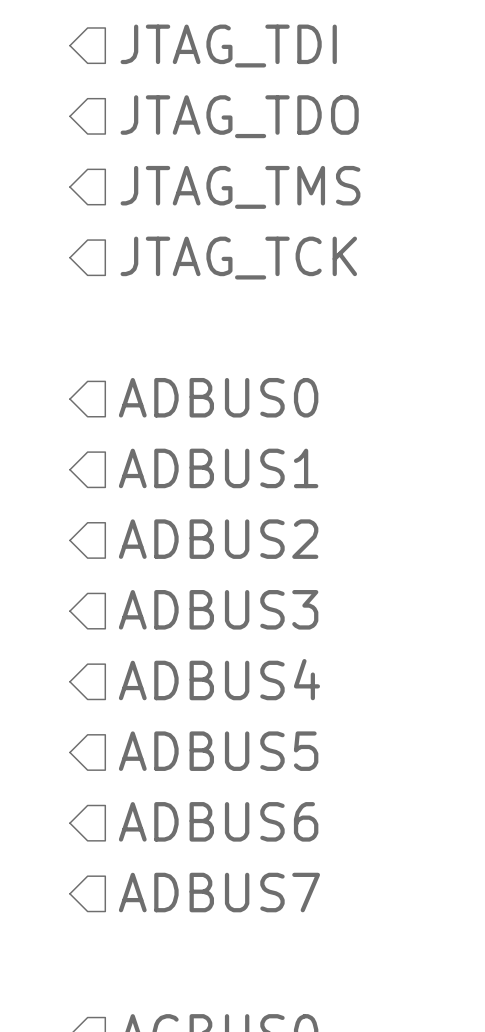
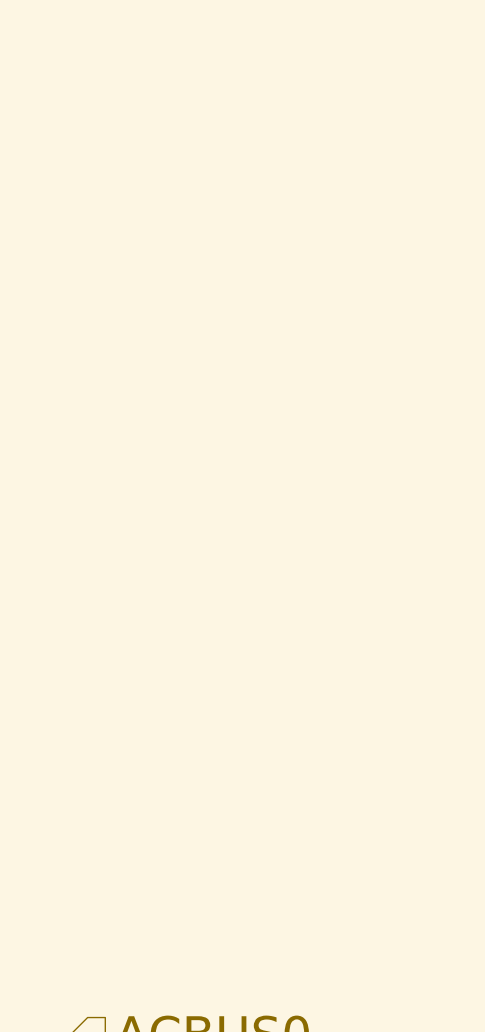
hierarchical label: JTAG_TDI (228, 46) -> none
hierarchical label: JTAG_TDO (239, 116) -> none
hierarchical label: JTAG_TMS (240, 187) -> none
hierarchical label: JTAG_TCK (238, 258) -> none
hierarchical label: ADBUS0 (218, 397) -> none
hierarchical label: ADBUS1 (218, 468) -> none
hierarchical label: ADBUS2 (218, 539) -> none
hierarchical label: ADBUS3 (218, 609) -> none
hierarchical label: ADBUS4 (219, 679) -> none
hierarchical label: ADBUS5 (218, 751) -> none
hierarchical label: ADBUS6 (218, 821) -> none
hierarchical label: ADBUS7 (219, 892) -> none

